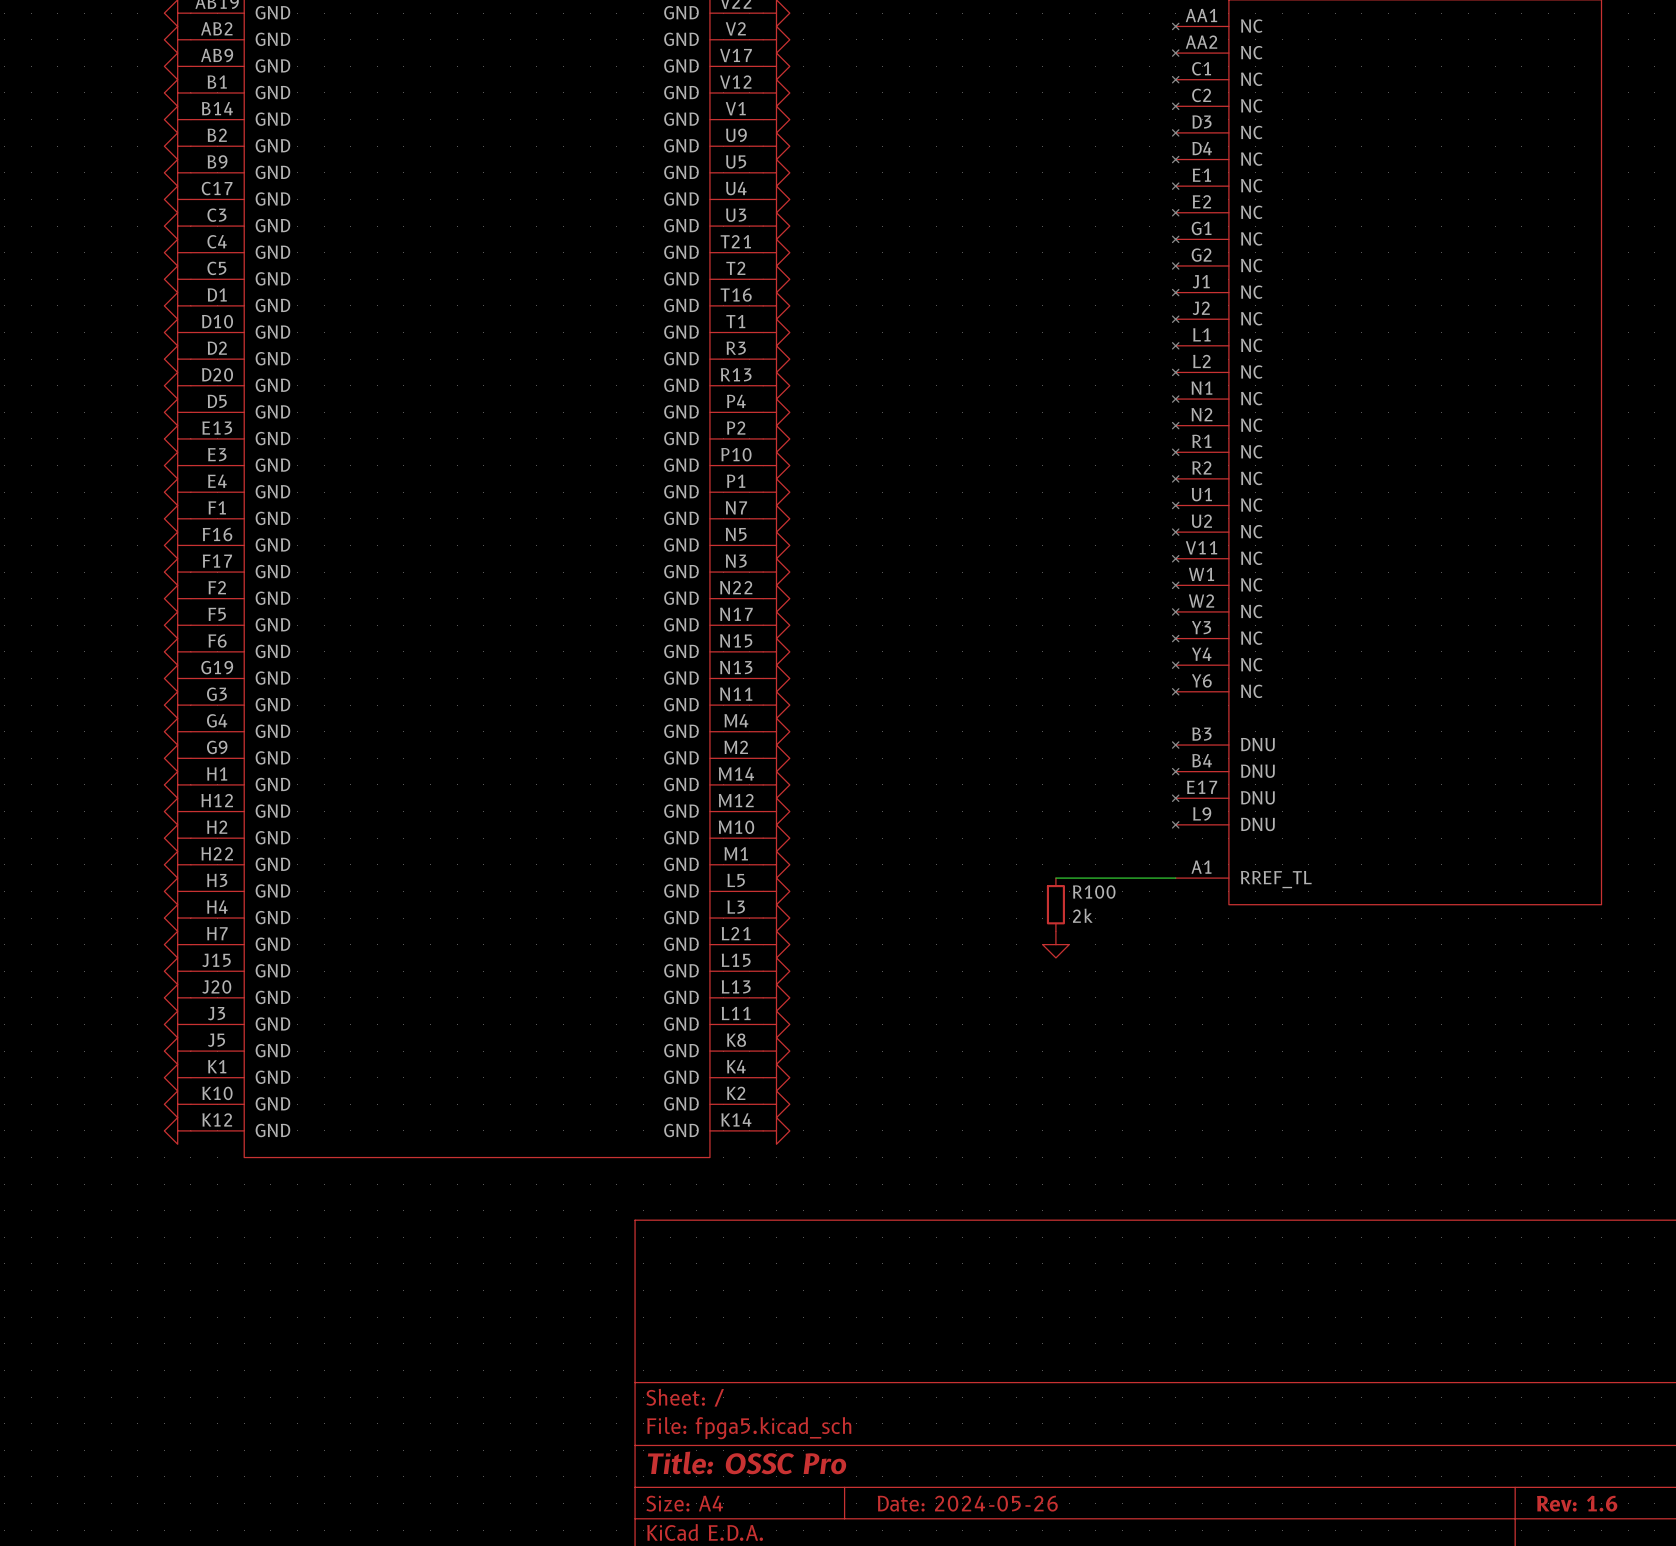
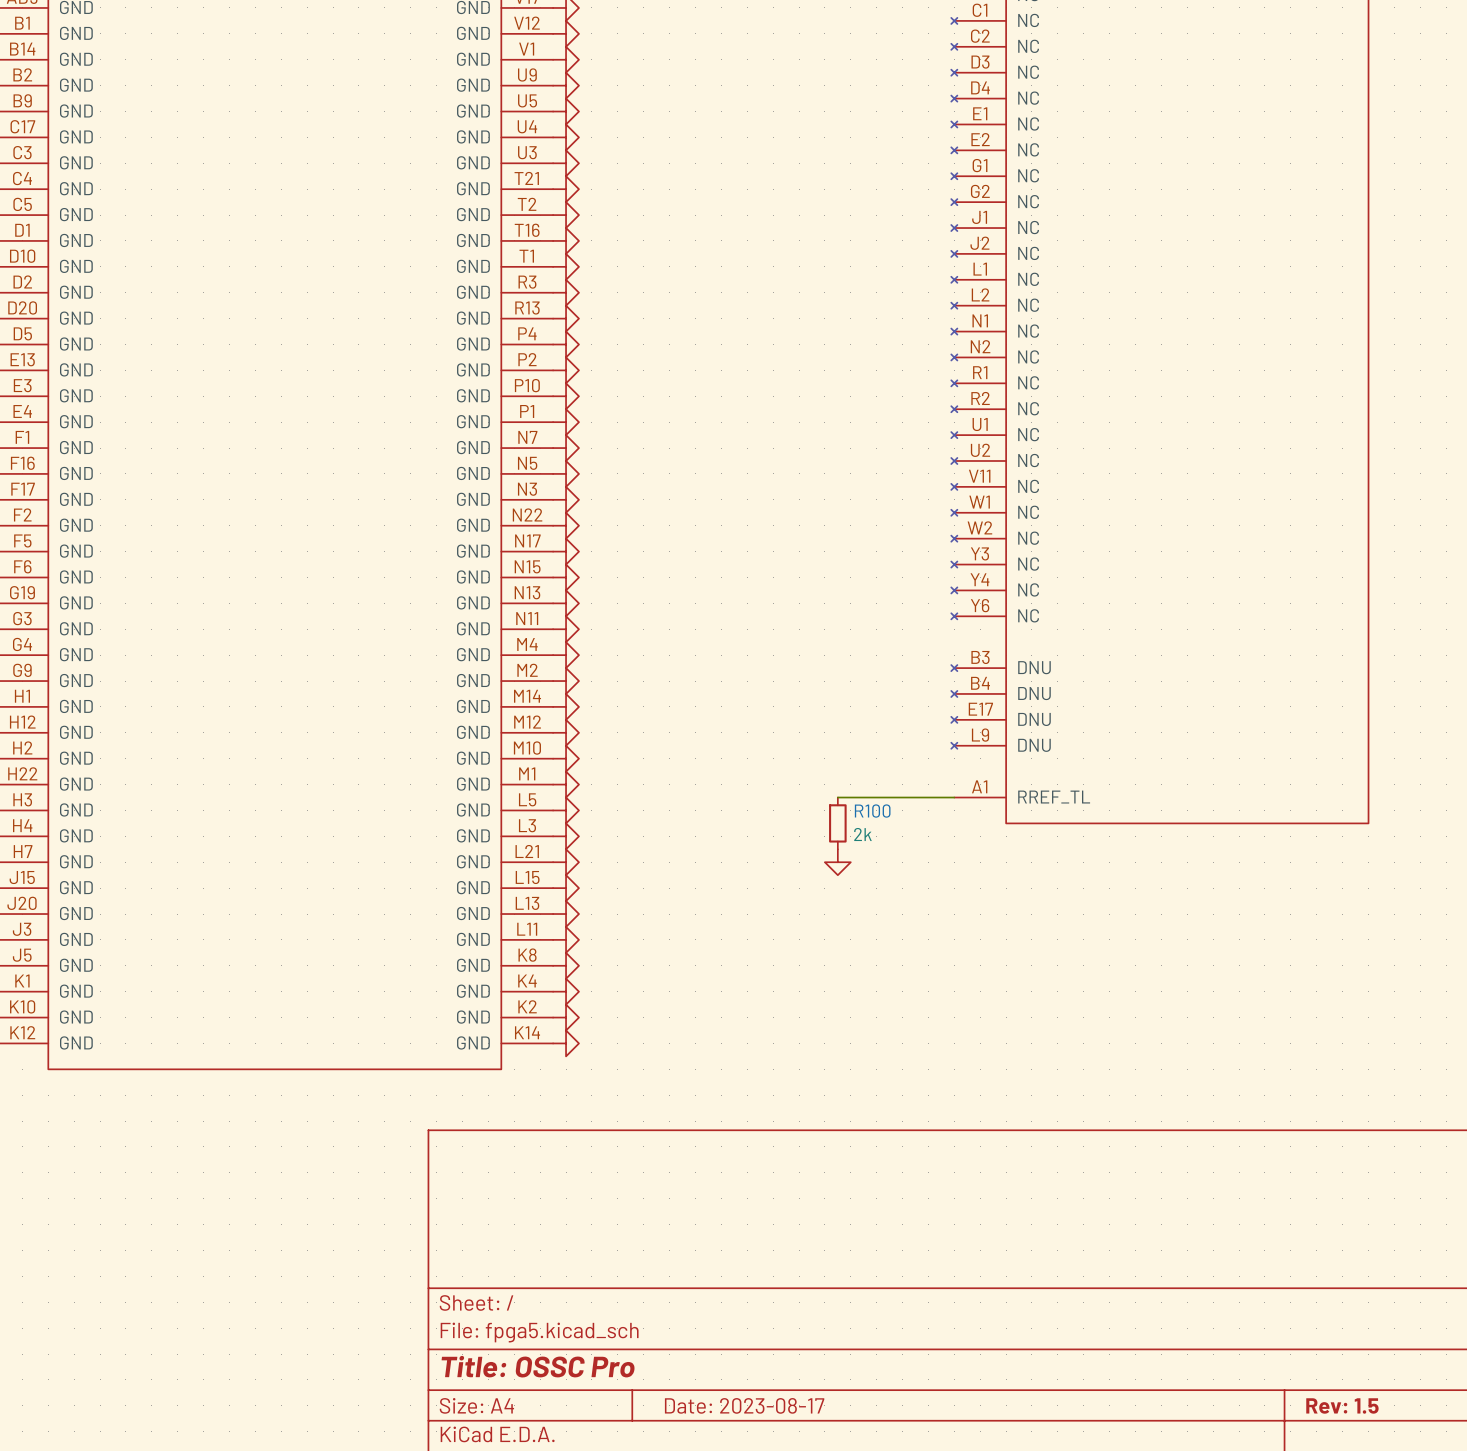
title block: Date: 2024-05-26 (967, 1503) -> Date: 2023-08-17 (744, 1405)
title block: Rev: 1.6 (1577, 1503) -> Rev: 1.5 (1342, 1405)

